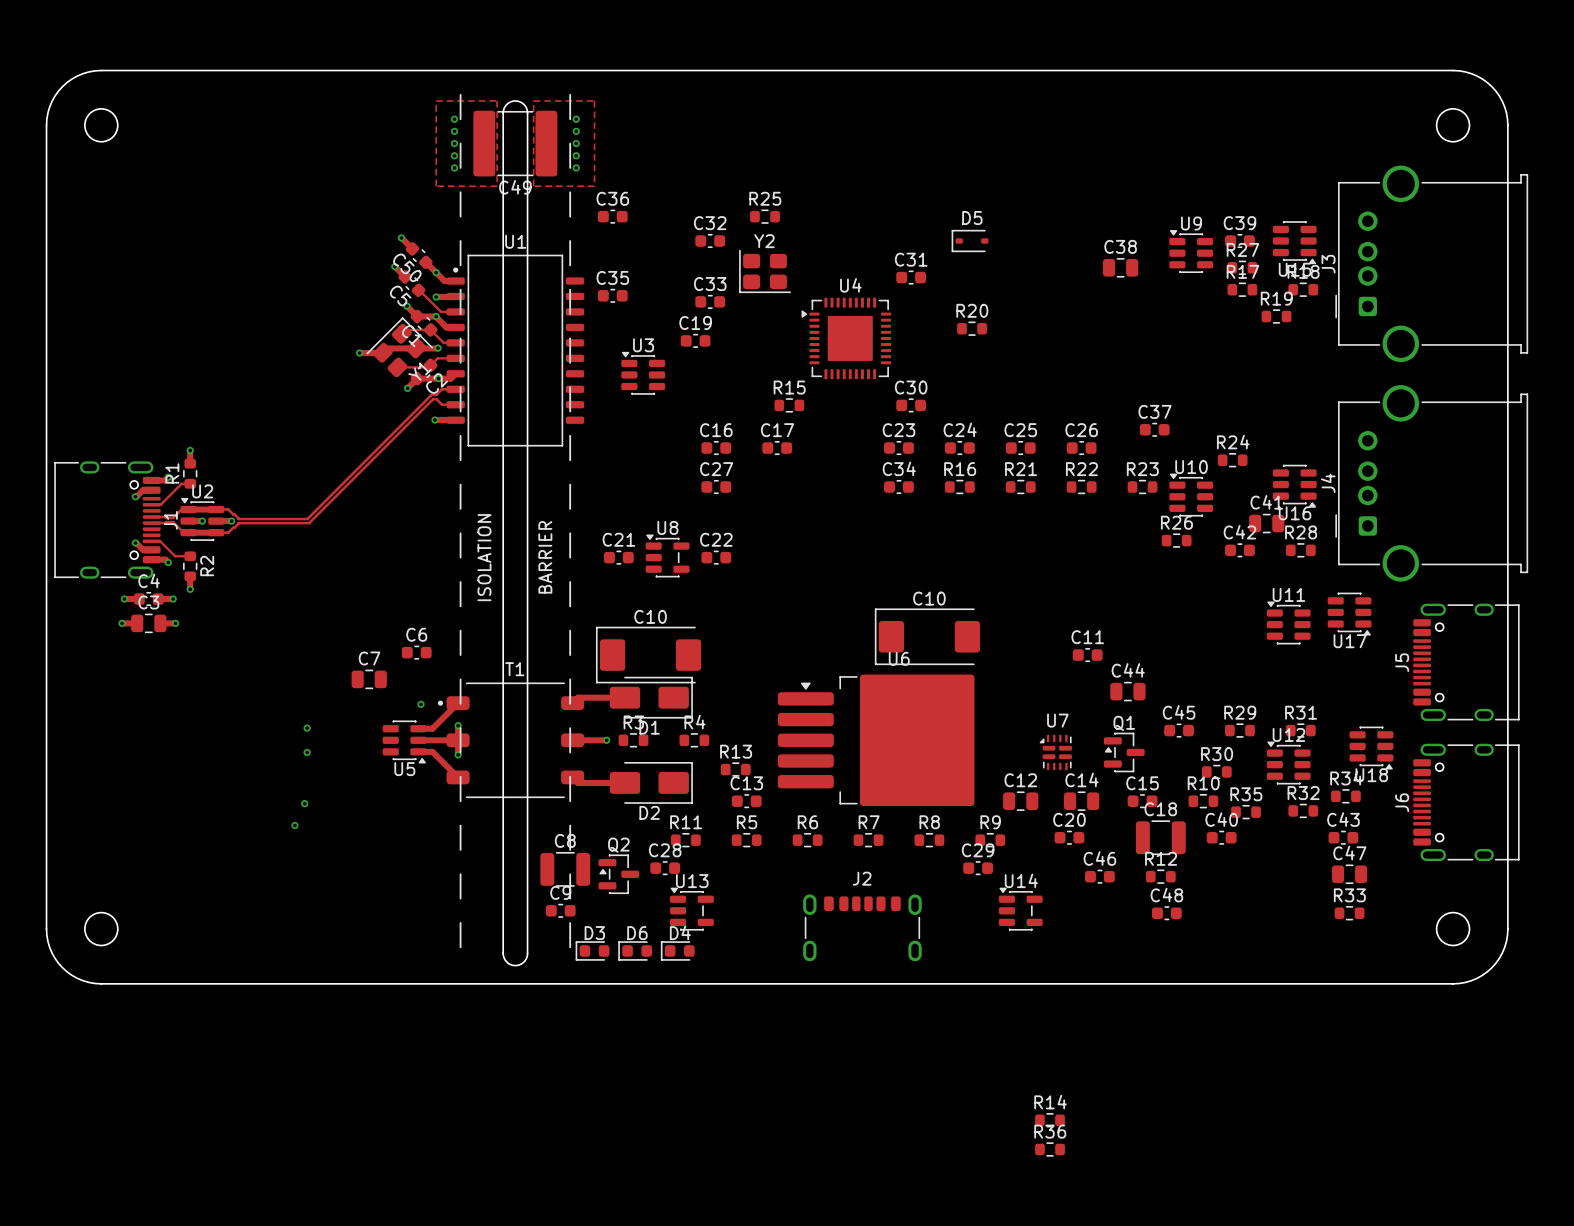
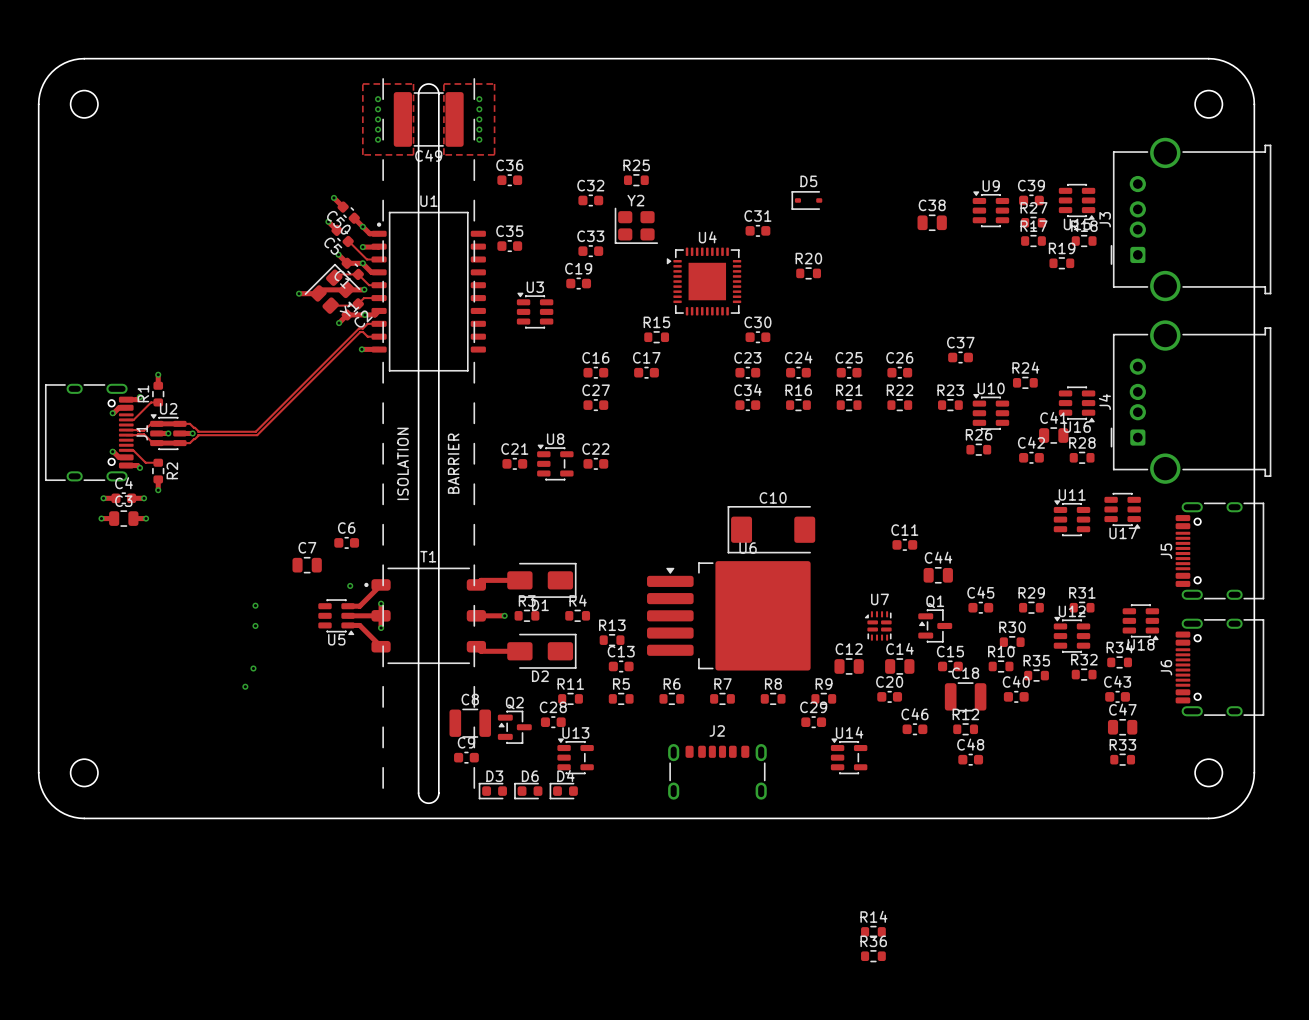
C10: (648, 655) -> none

